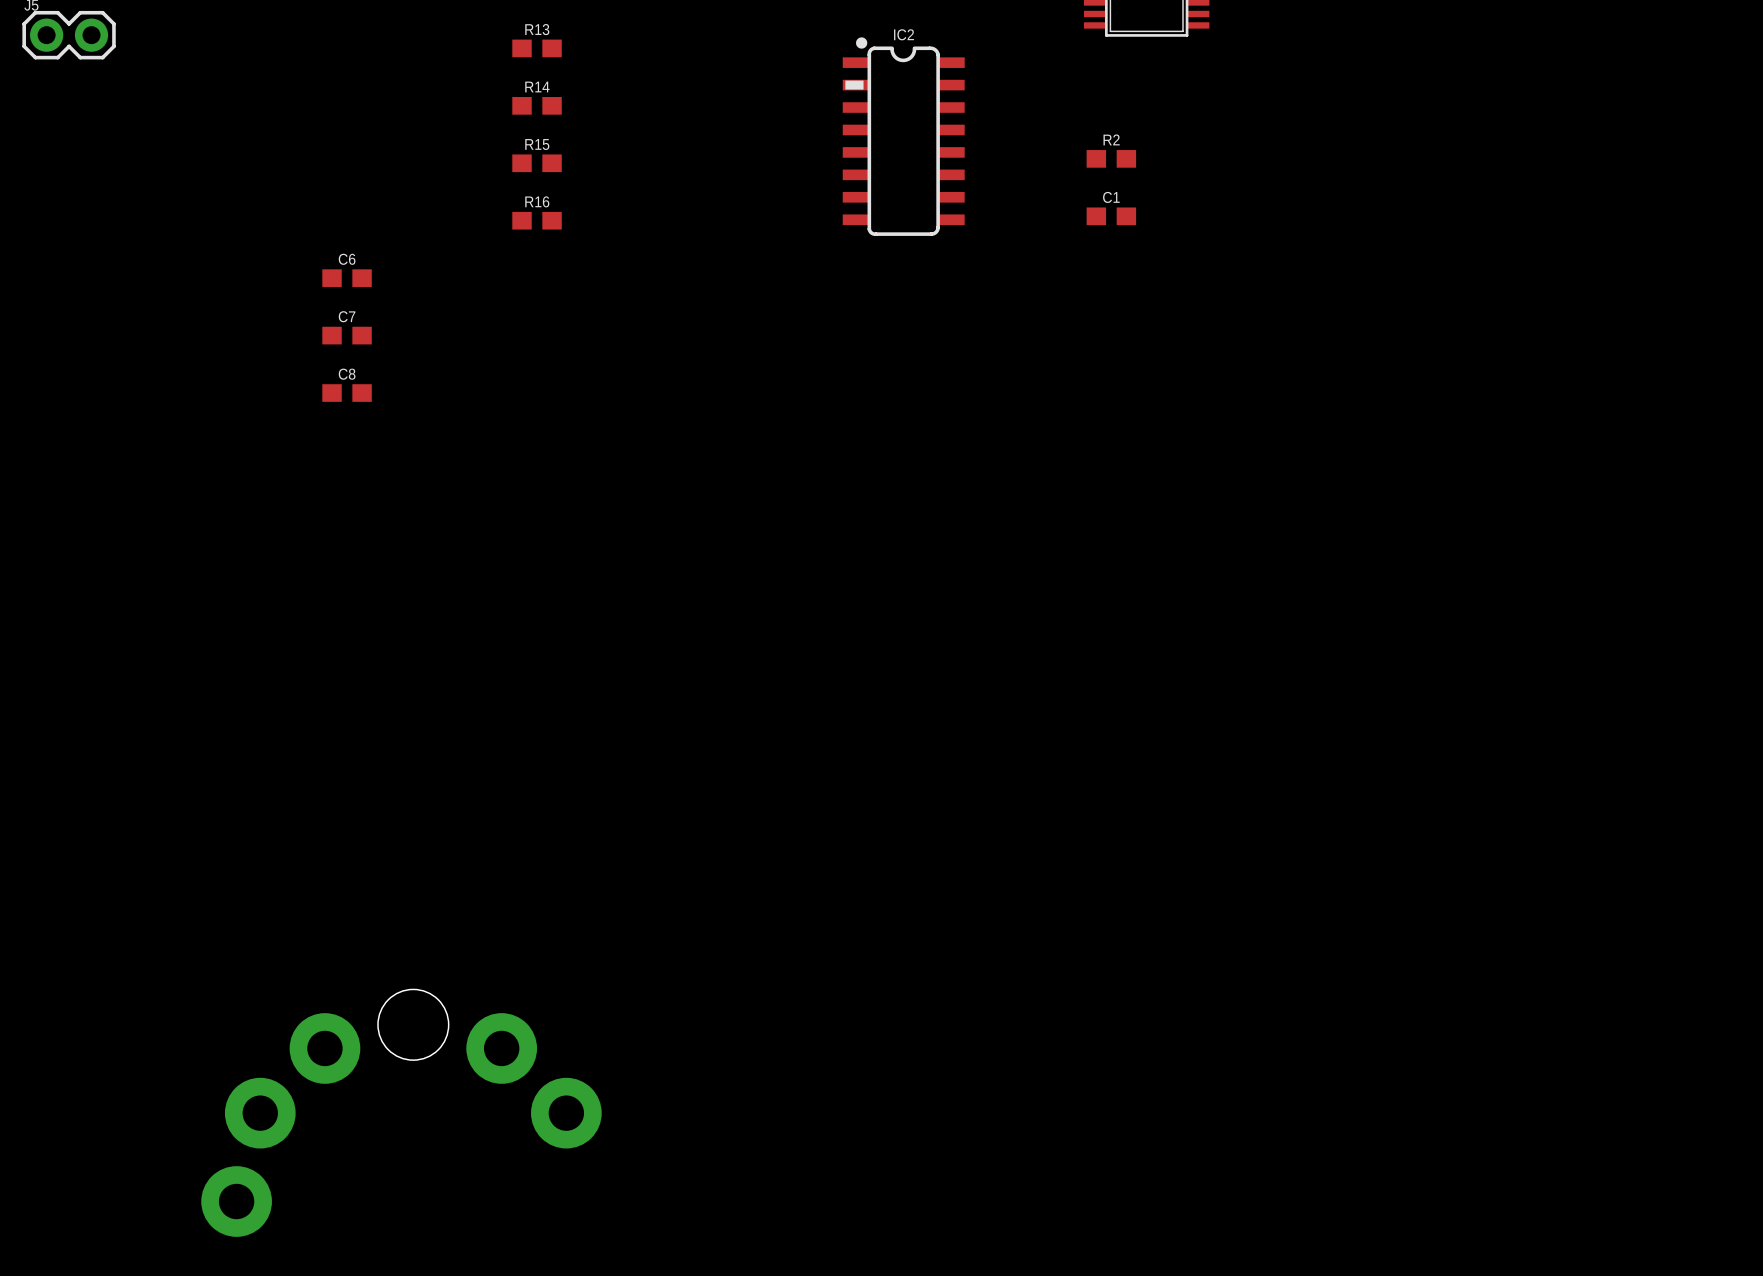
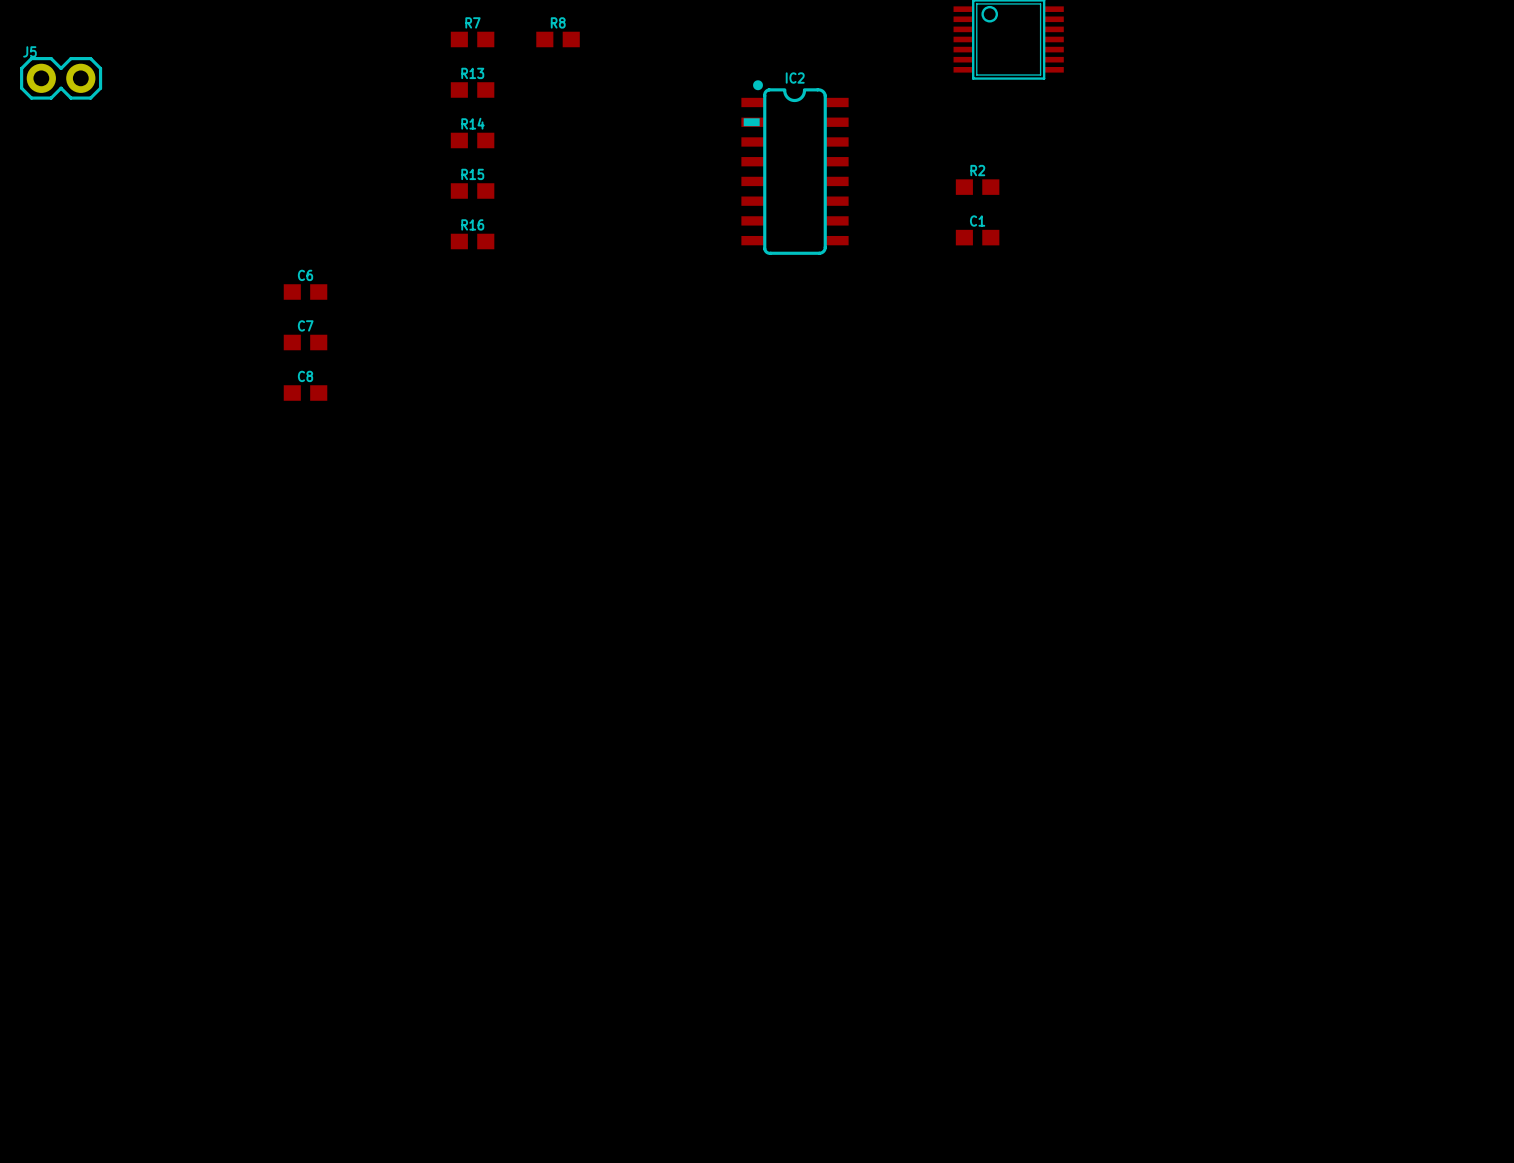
part: (401, 1113) -> none

